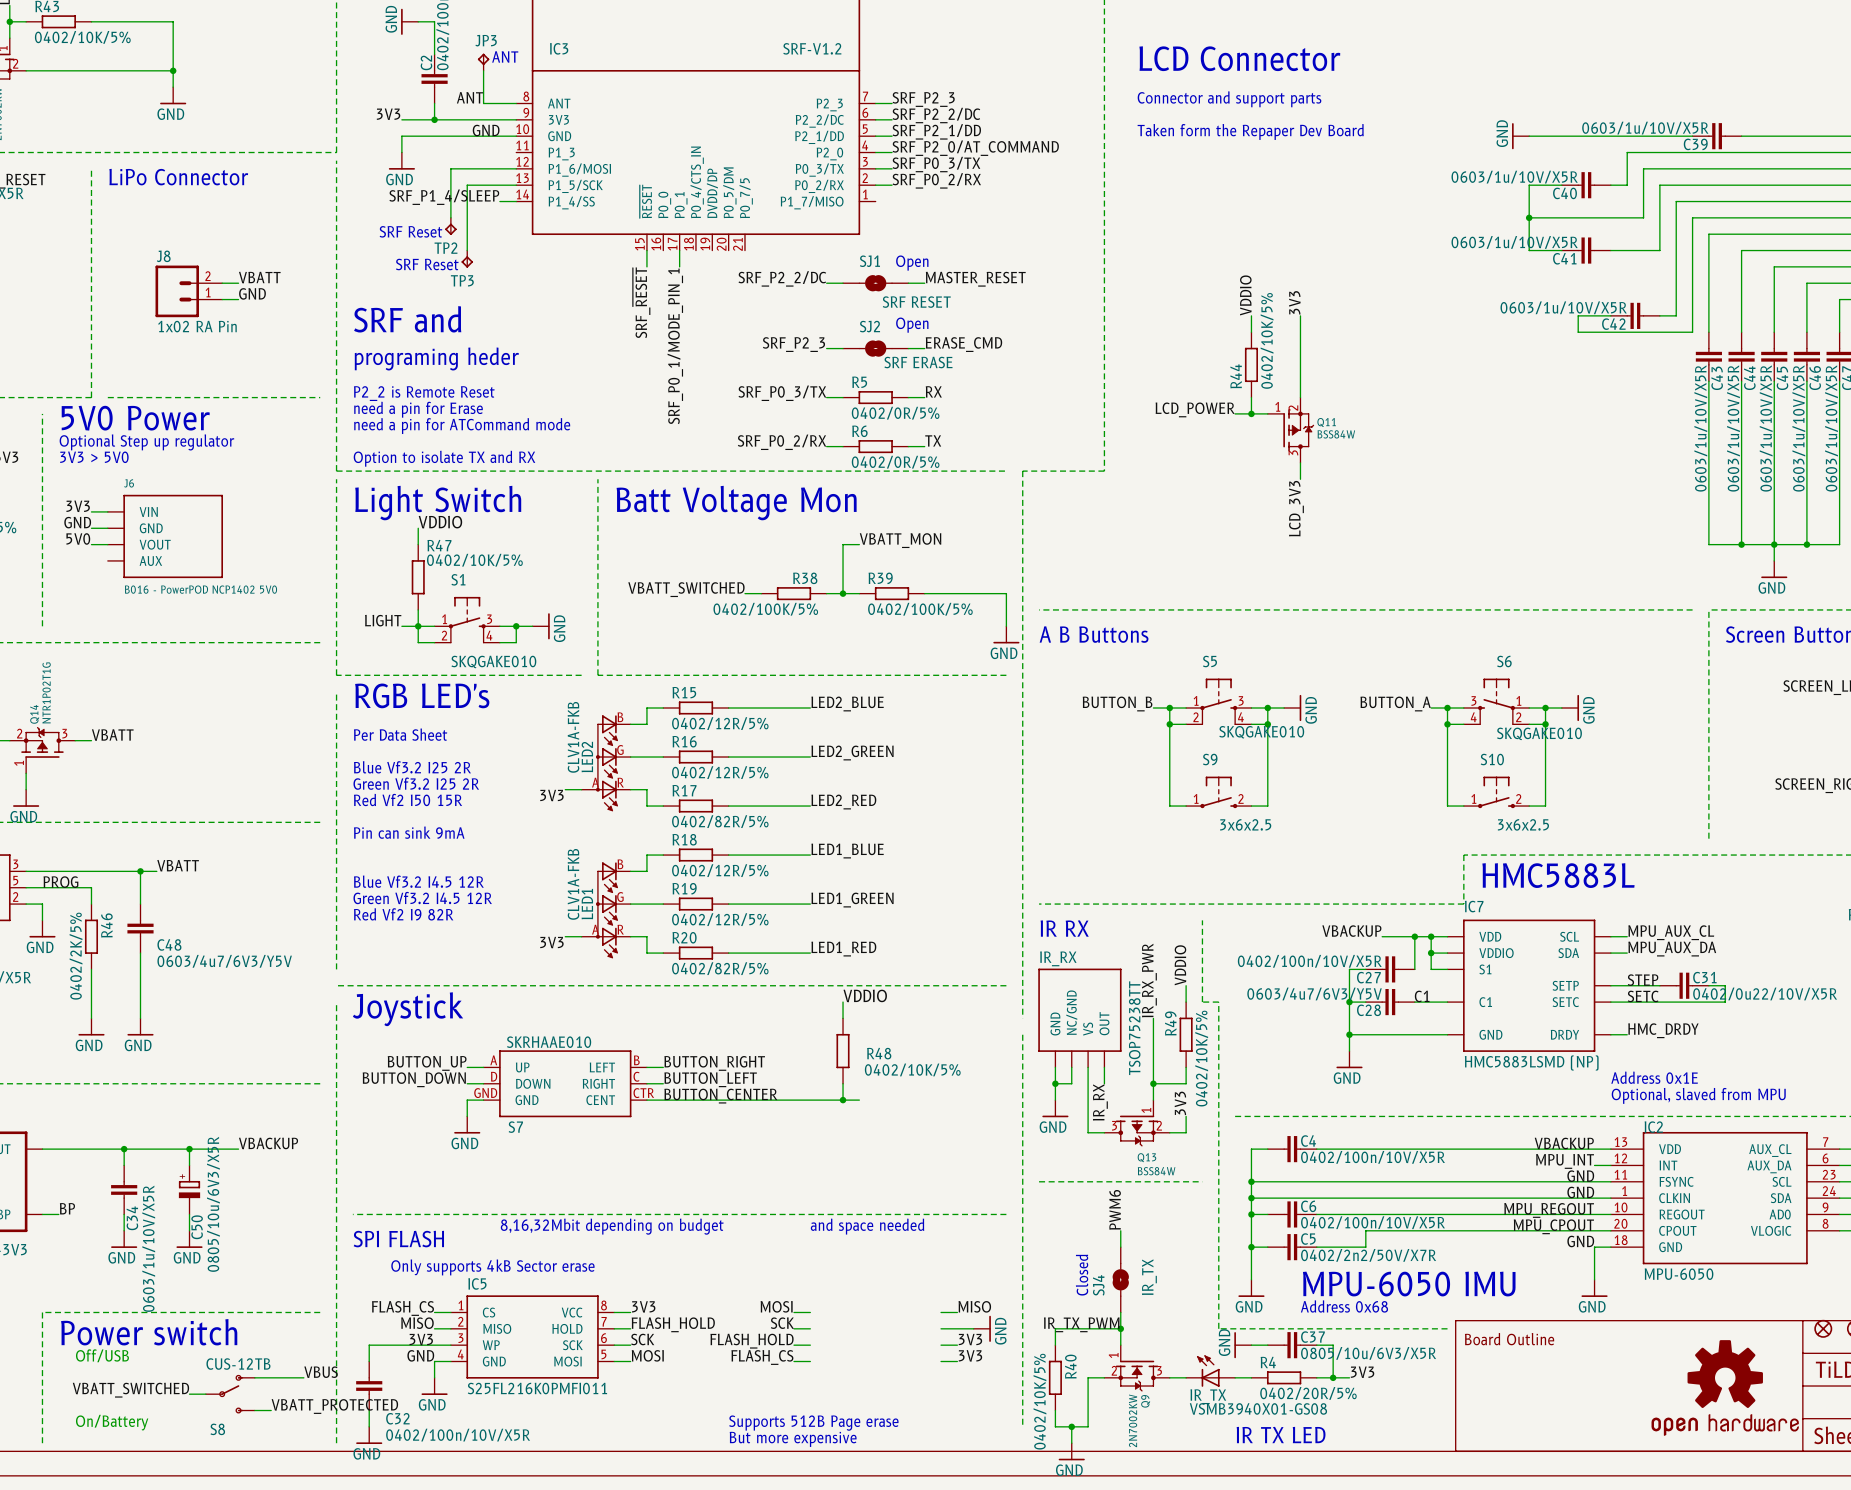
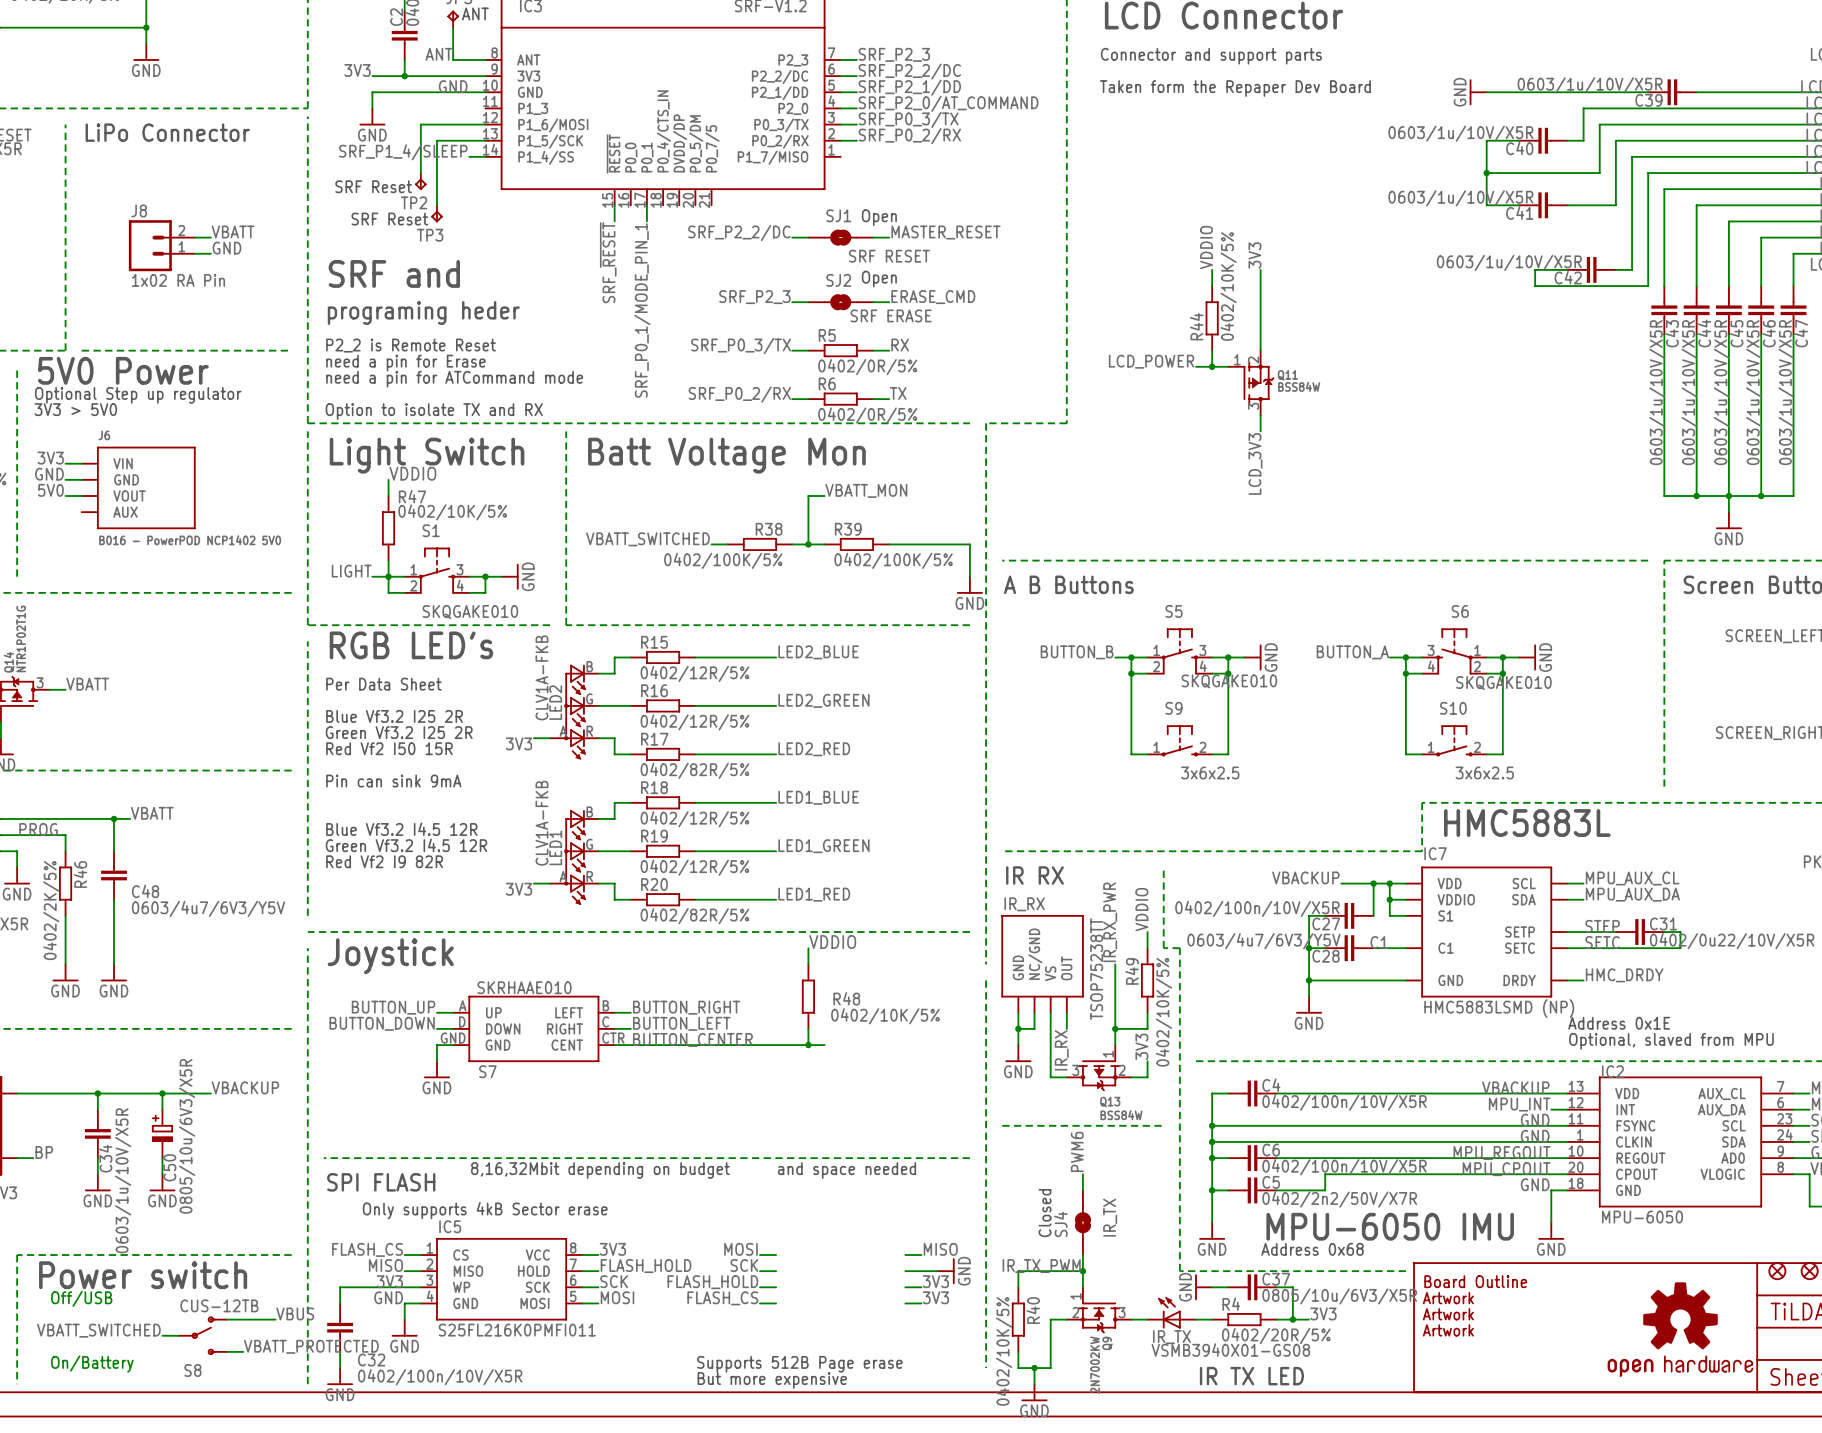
part: none -> (1448, 1298)
part: none -> (1448, 1314)
part: none -> (1448, 1330)

